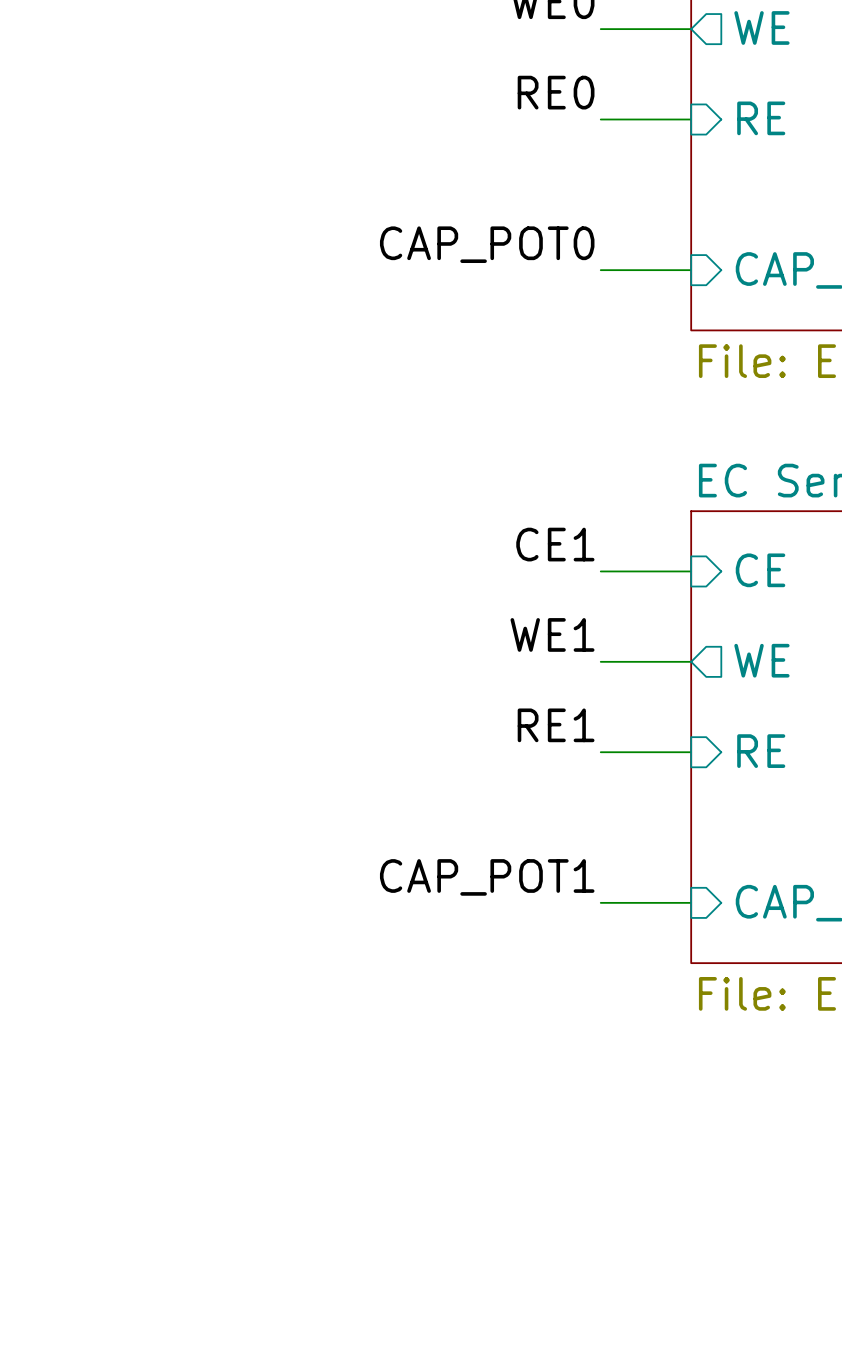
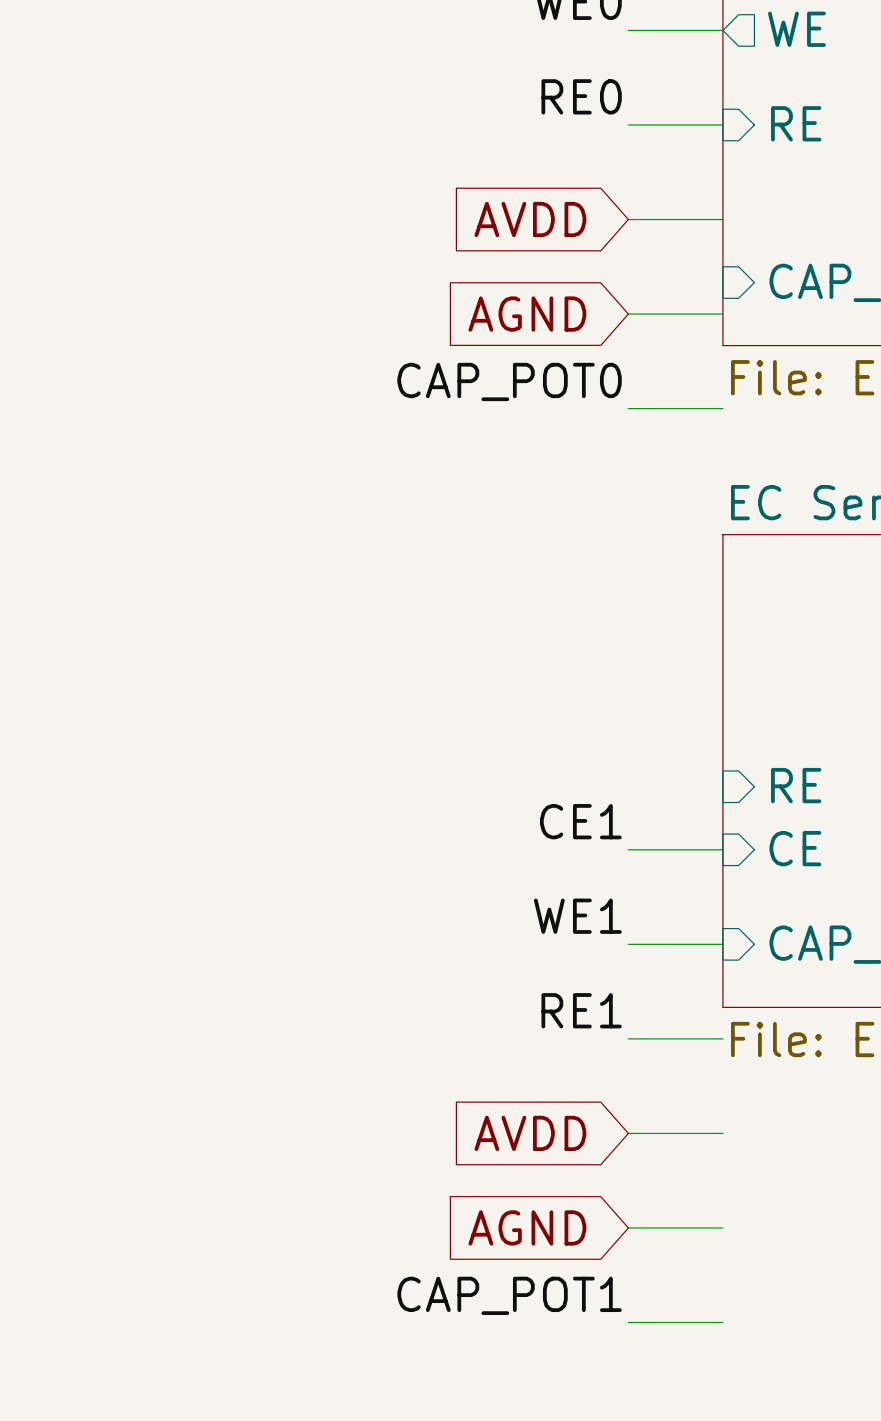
global label: none -> AVDD (530, 219)
label position: CAP_POT0 (487, 244) -> CAP_POT0 (509, 381)
wire: (600, 270) (691, 270) -> (628, 849) (722, 849)
global label: none -> AGND (527, 314)
label position: CE1 (555, 544) -> CE1 (580, 821)
sheet pin position: CE (760, 570) -> CE (795, 848)
wire: (600, 571) (691, 571) -> (628, 219) (722, 219)
label: WE1 (552, 634) -> none
sheet pin: WE (761, 660) -> none
wire: (600, 661) (691, 661) -> (628, 314) (722, 314)
label position: RE1 (556, 725) -> RE1 (581, 1010)
wire: (600, 752) (691, 752) -> (628, 408) (722, 408)
label: CAP_POT1 (487, 877) -> WE1 (577, 916)
wire: none -> (628, 1038) (722, 1038)
global label: none -> AVDD (530, 1133)
wire: none -> (628, 1133) (722, 1133)
global label: none -> AGND (527, 1227)
wire: none -> (628, 1227) (722, 1227)
label: none -> CAP_POT1 (509, 1295)
wire: none -> (628, 1322) (722, 1322)

